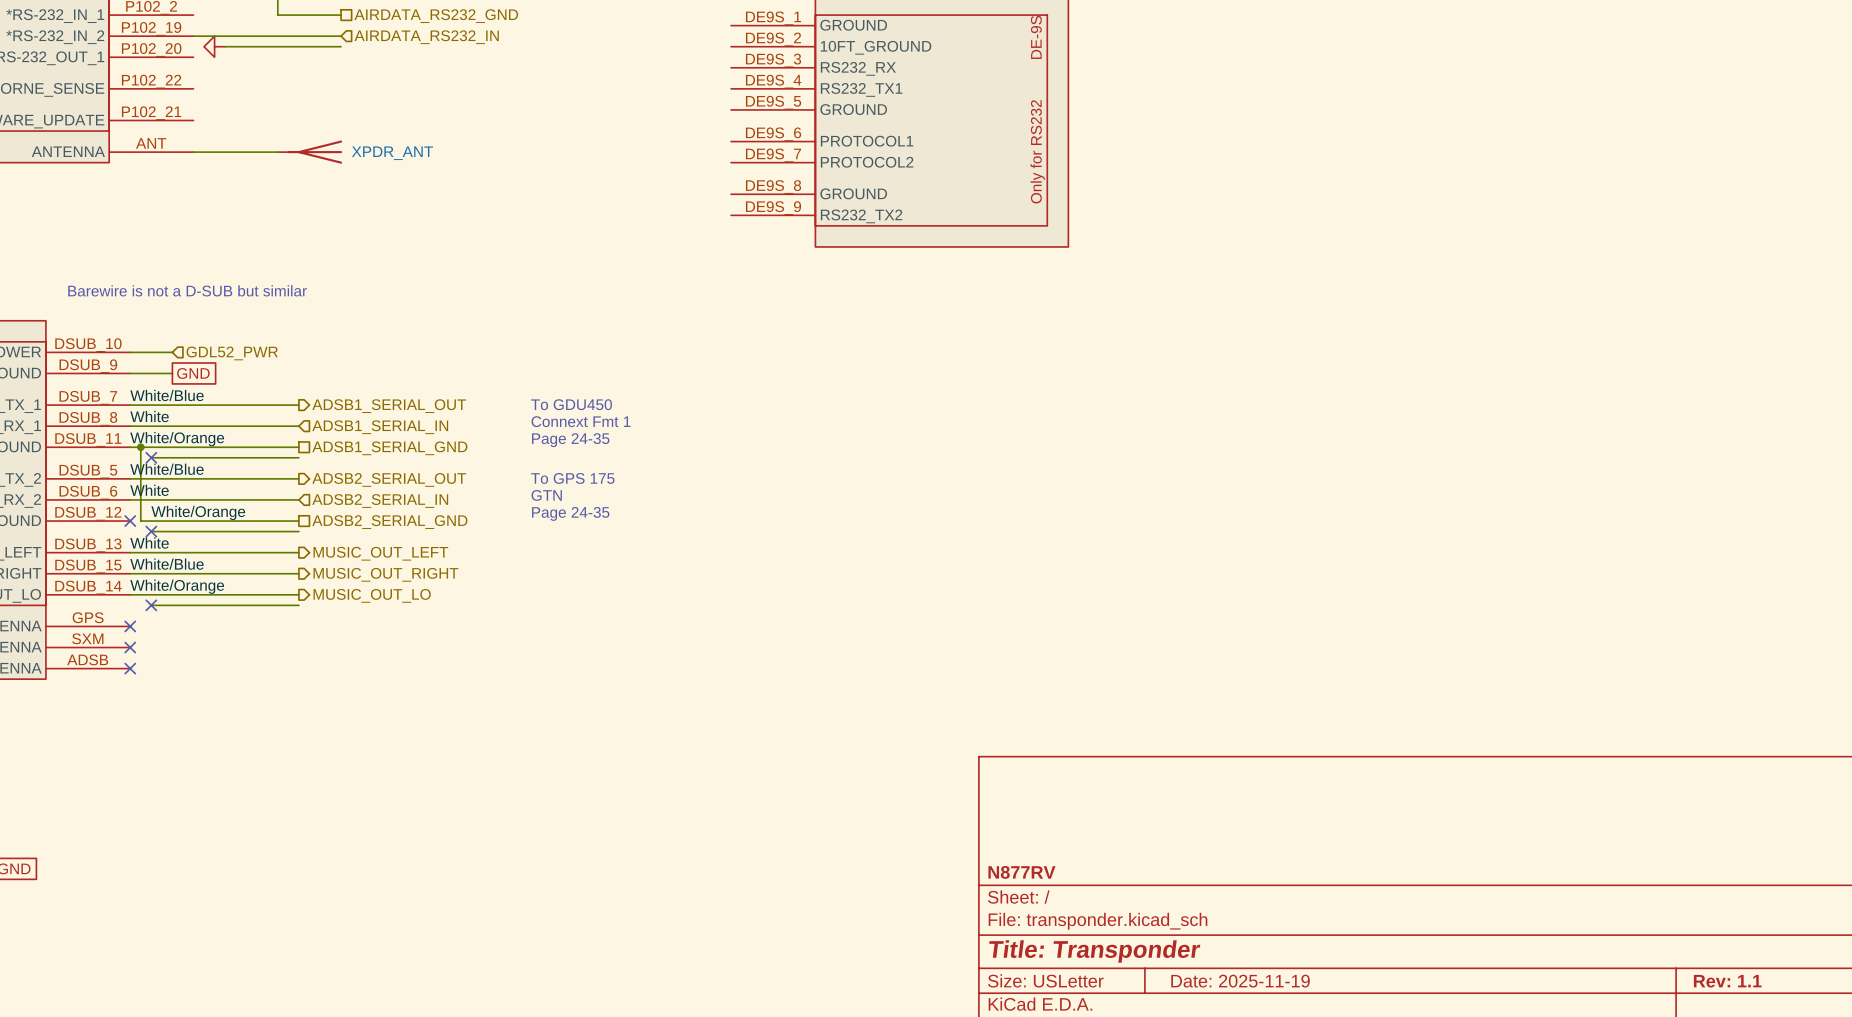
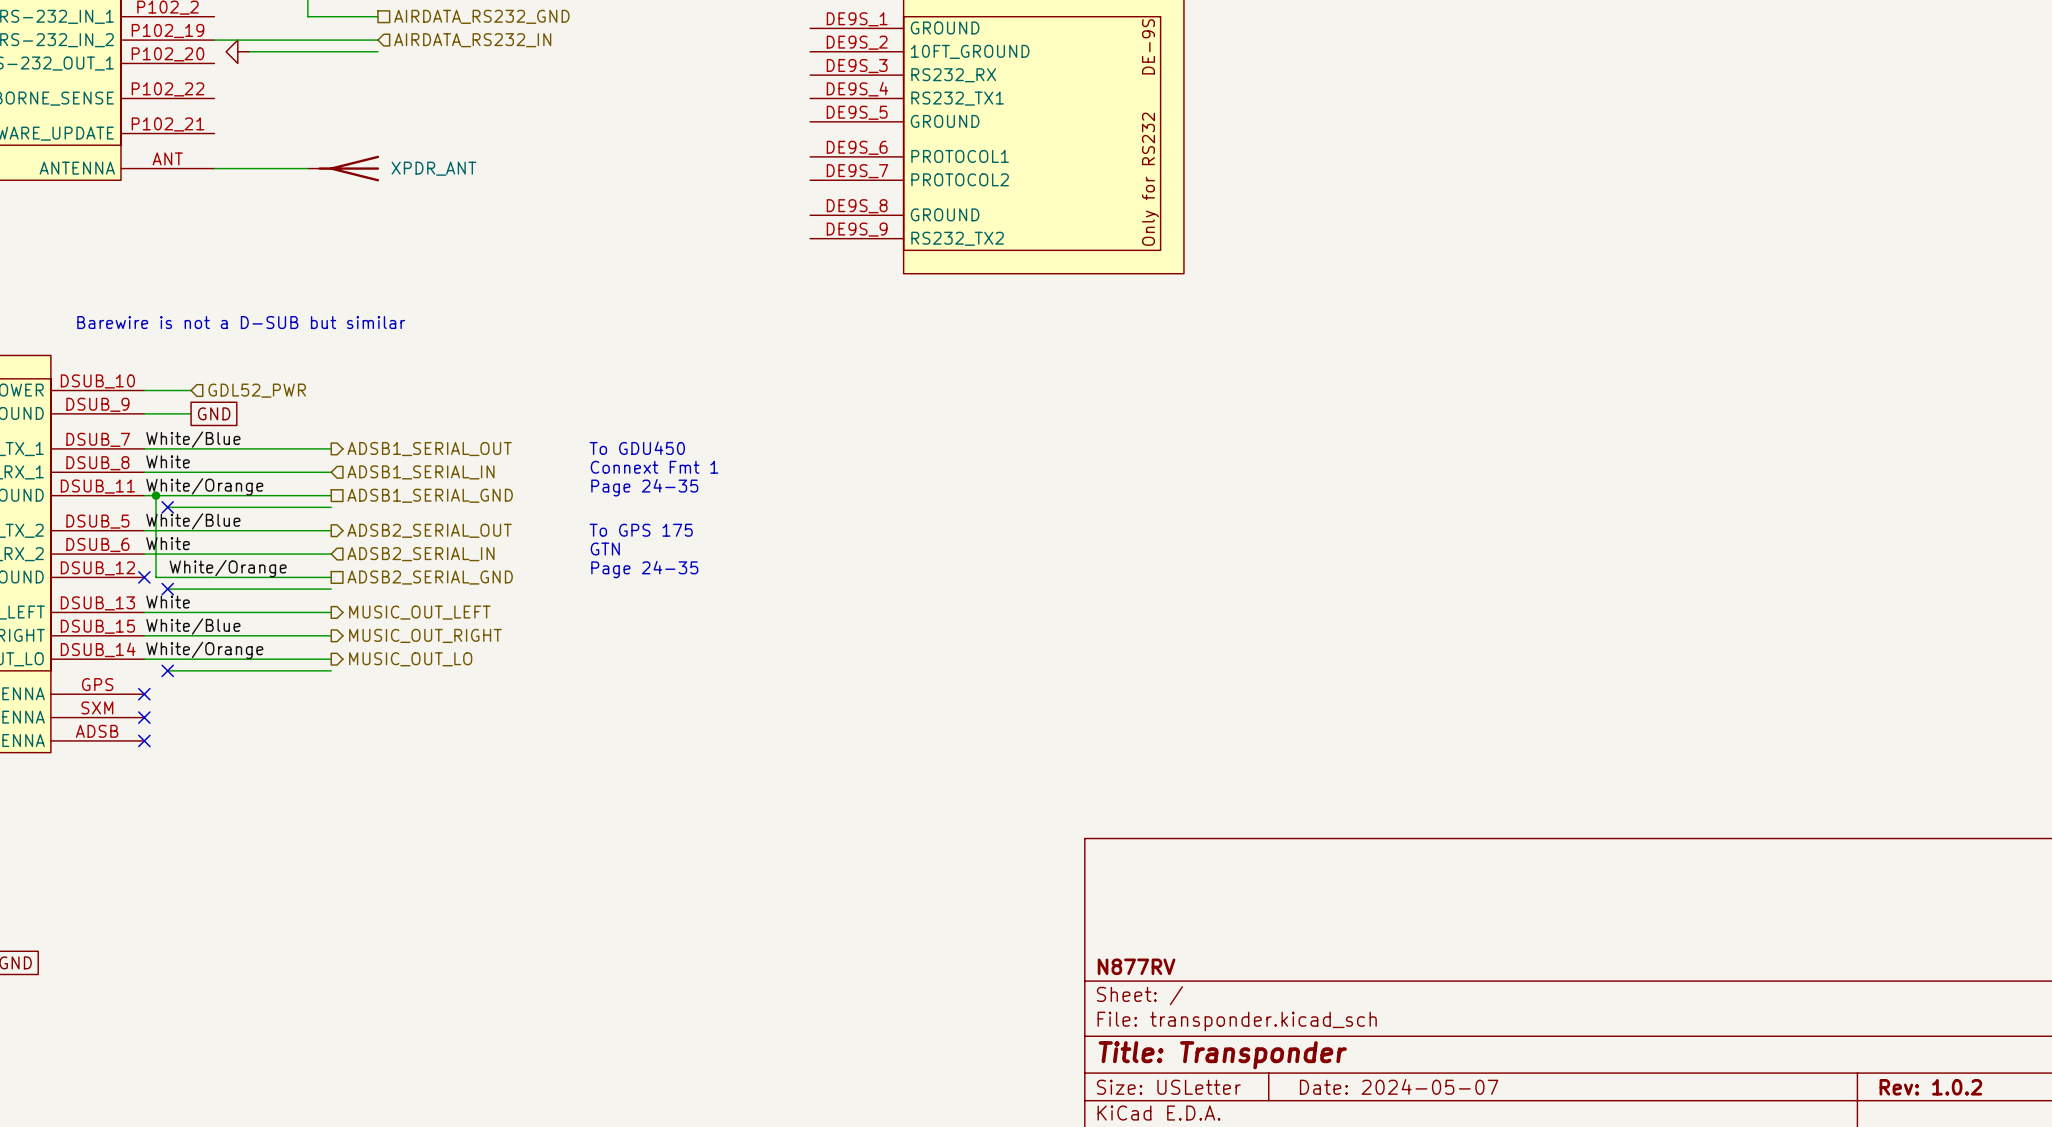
title block: Date: 2025-11-19 (1240, 981) -> Date: 2024-05-07 (1399, 1086)
title block: Rev: 1.1 (1727, 981) -> Rev: 1.0.2 (1930, 1087)

